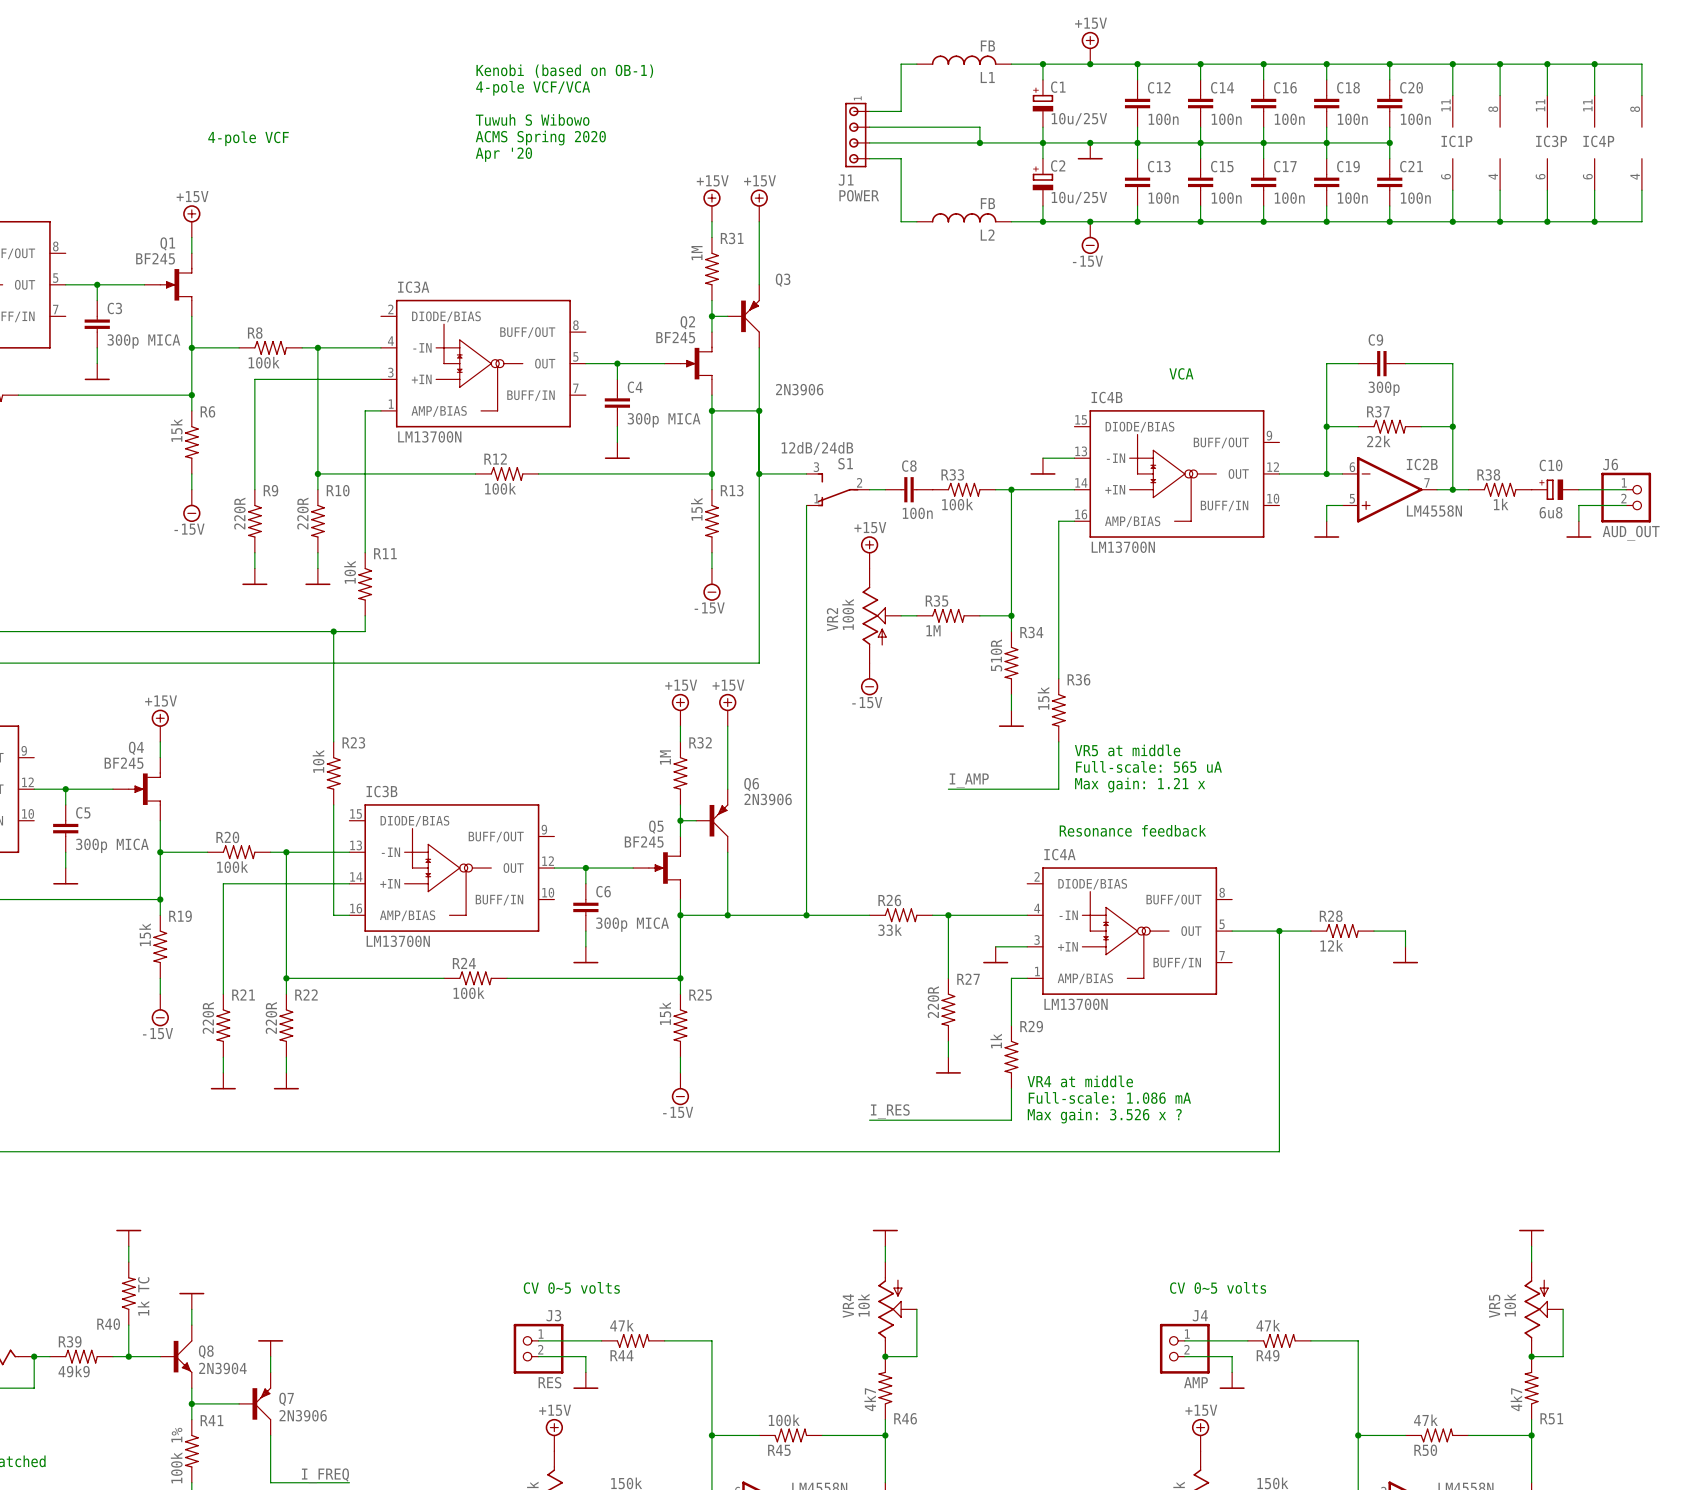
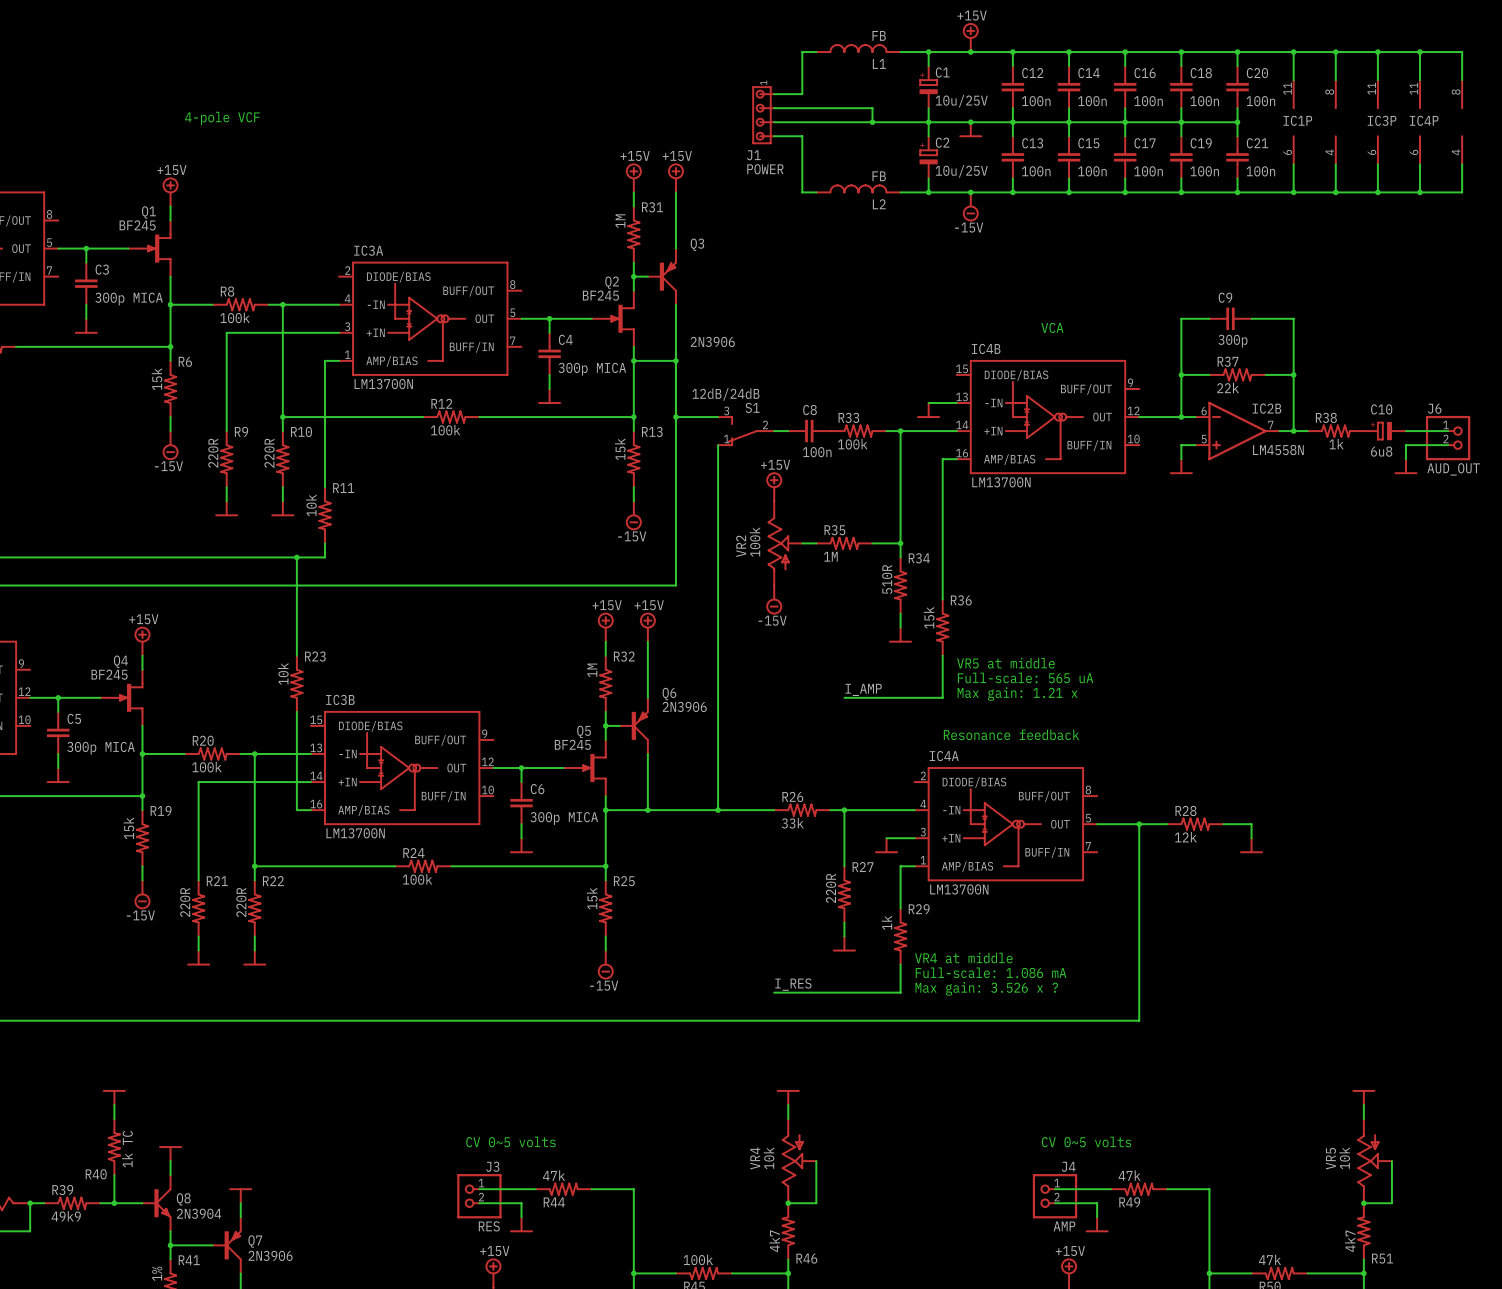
text: Kenobi (based on OB-1) (564, 71) -> none
text: 4-pole VCF/VCA (533, 88) -> none
text: Tuwuh S Wibowo (532, 119) -> none
text: ACMS Spring 2020 (540, 138) -> none
text: Apr '20 (503, 154) -> none

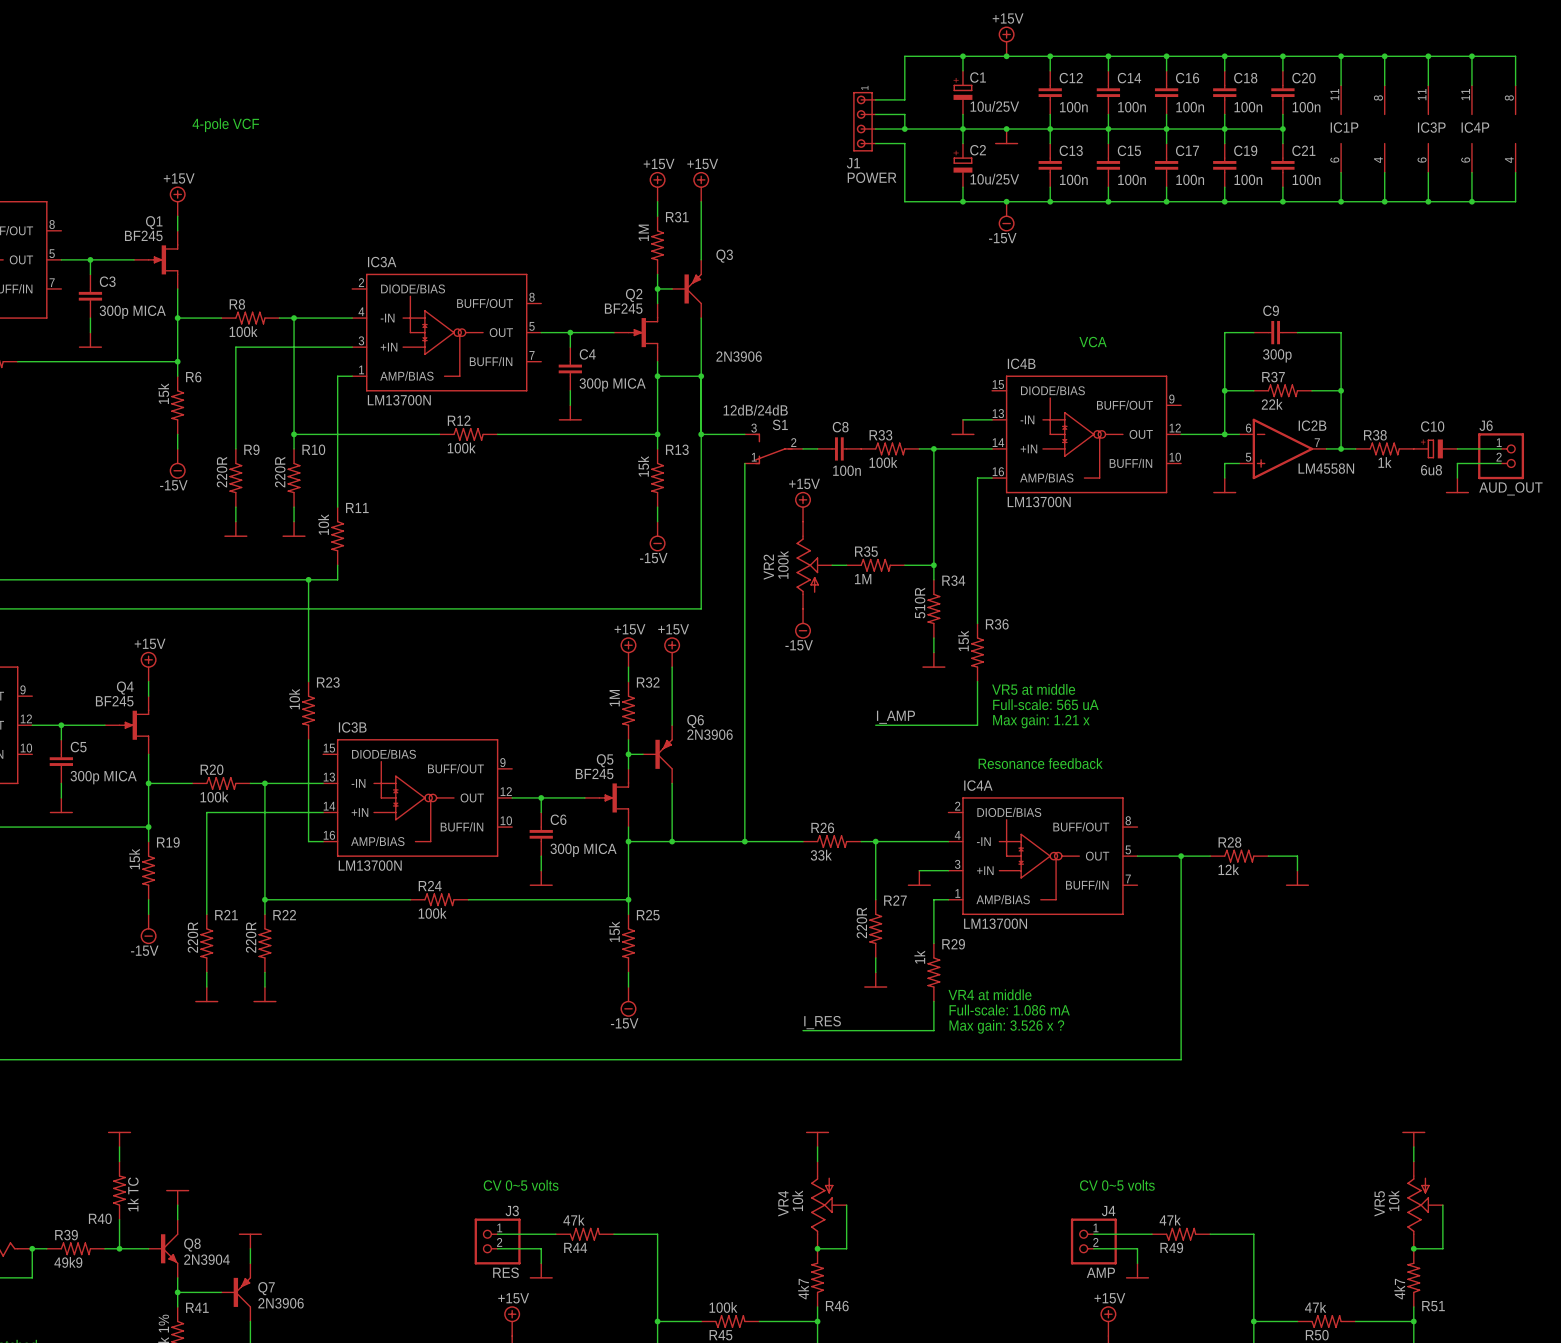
L1: FB (858, 48) -> none
wire: (816, 52) (802, 52) (802, 94) (774, 94) -> none
wire: none -> (933, 56) (904, 56) (904, 99) (875, 99)
wire: (774, 108) (844, 108) -> none
J1 position: (763, 115) -> (864, 121)
wire: (774, 122) (844, 122) -> none
wire: (774, 136) (802, 136) (802, 192) (816, 192) -> none
wire: none -> (875, 143) (904, 143) (904, 201) (933, 201)
L2: FB (858, 188) -> none

